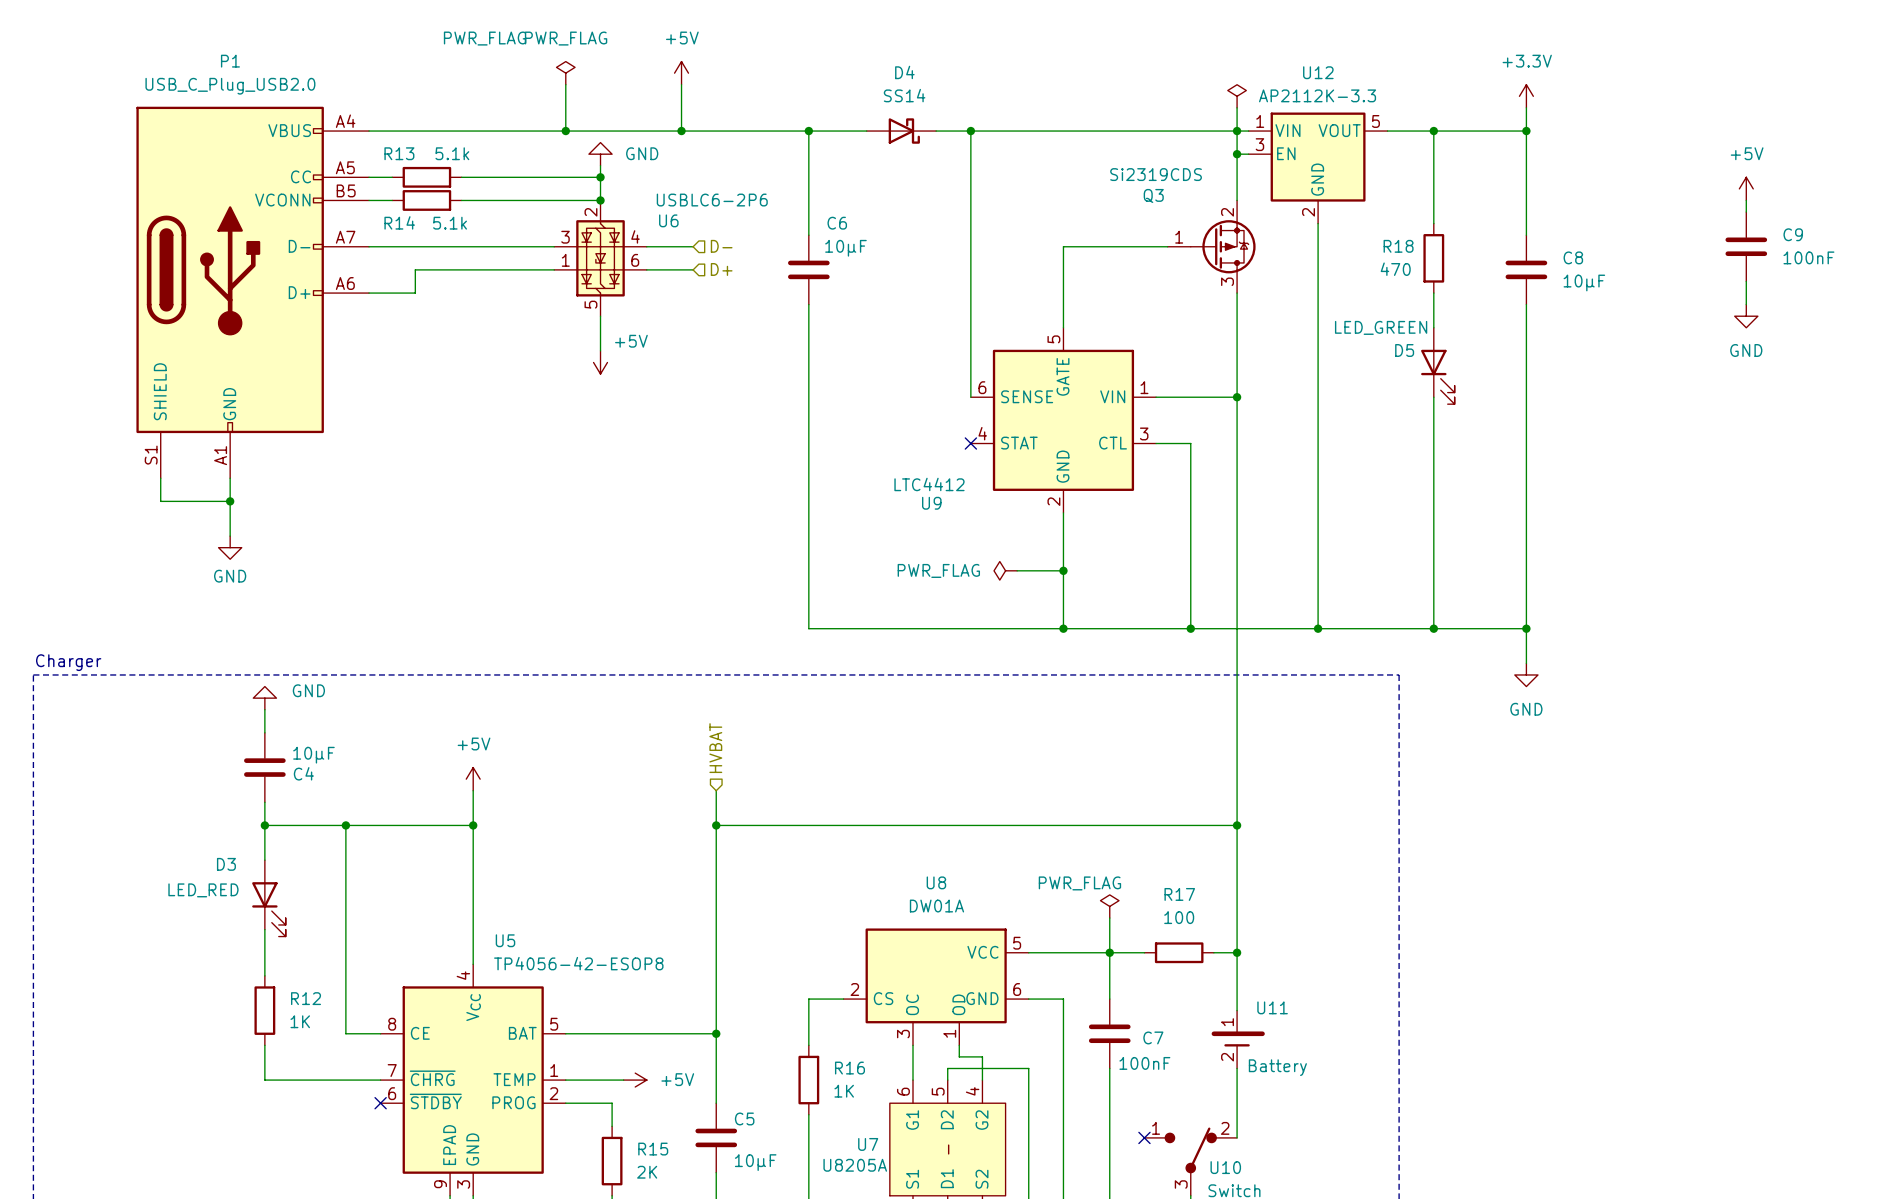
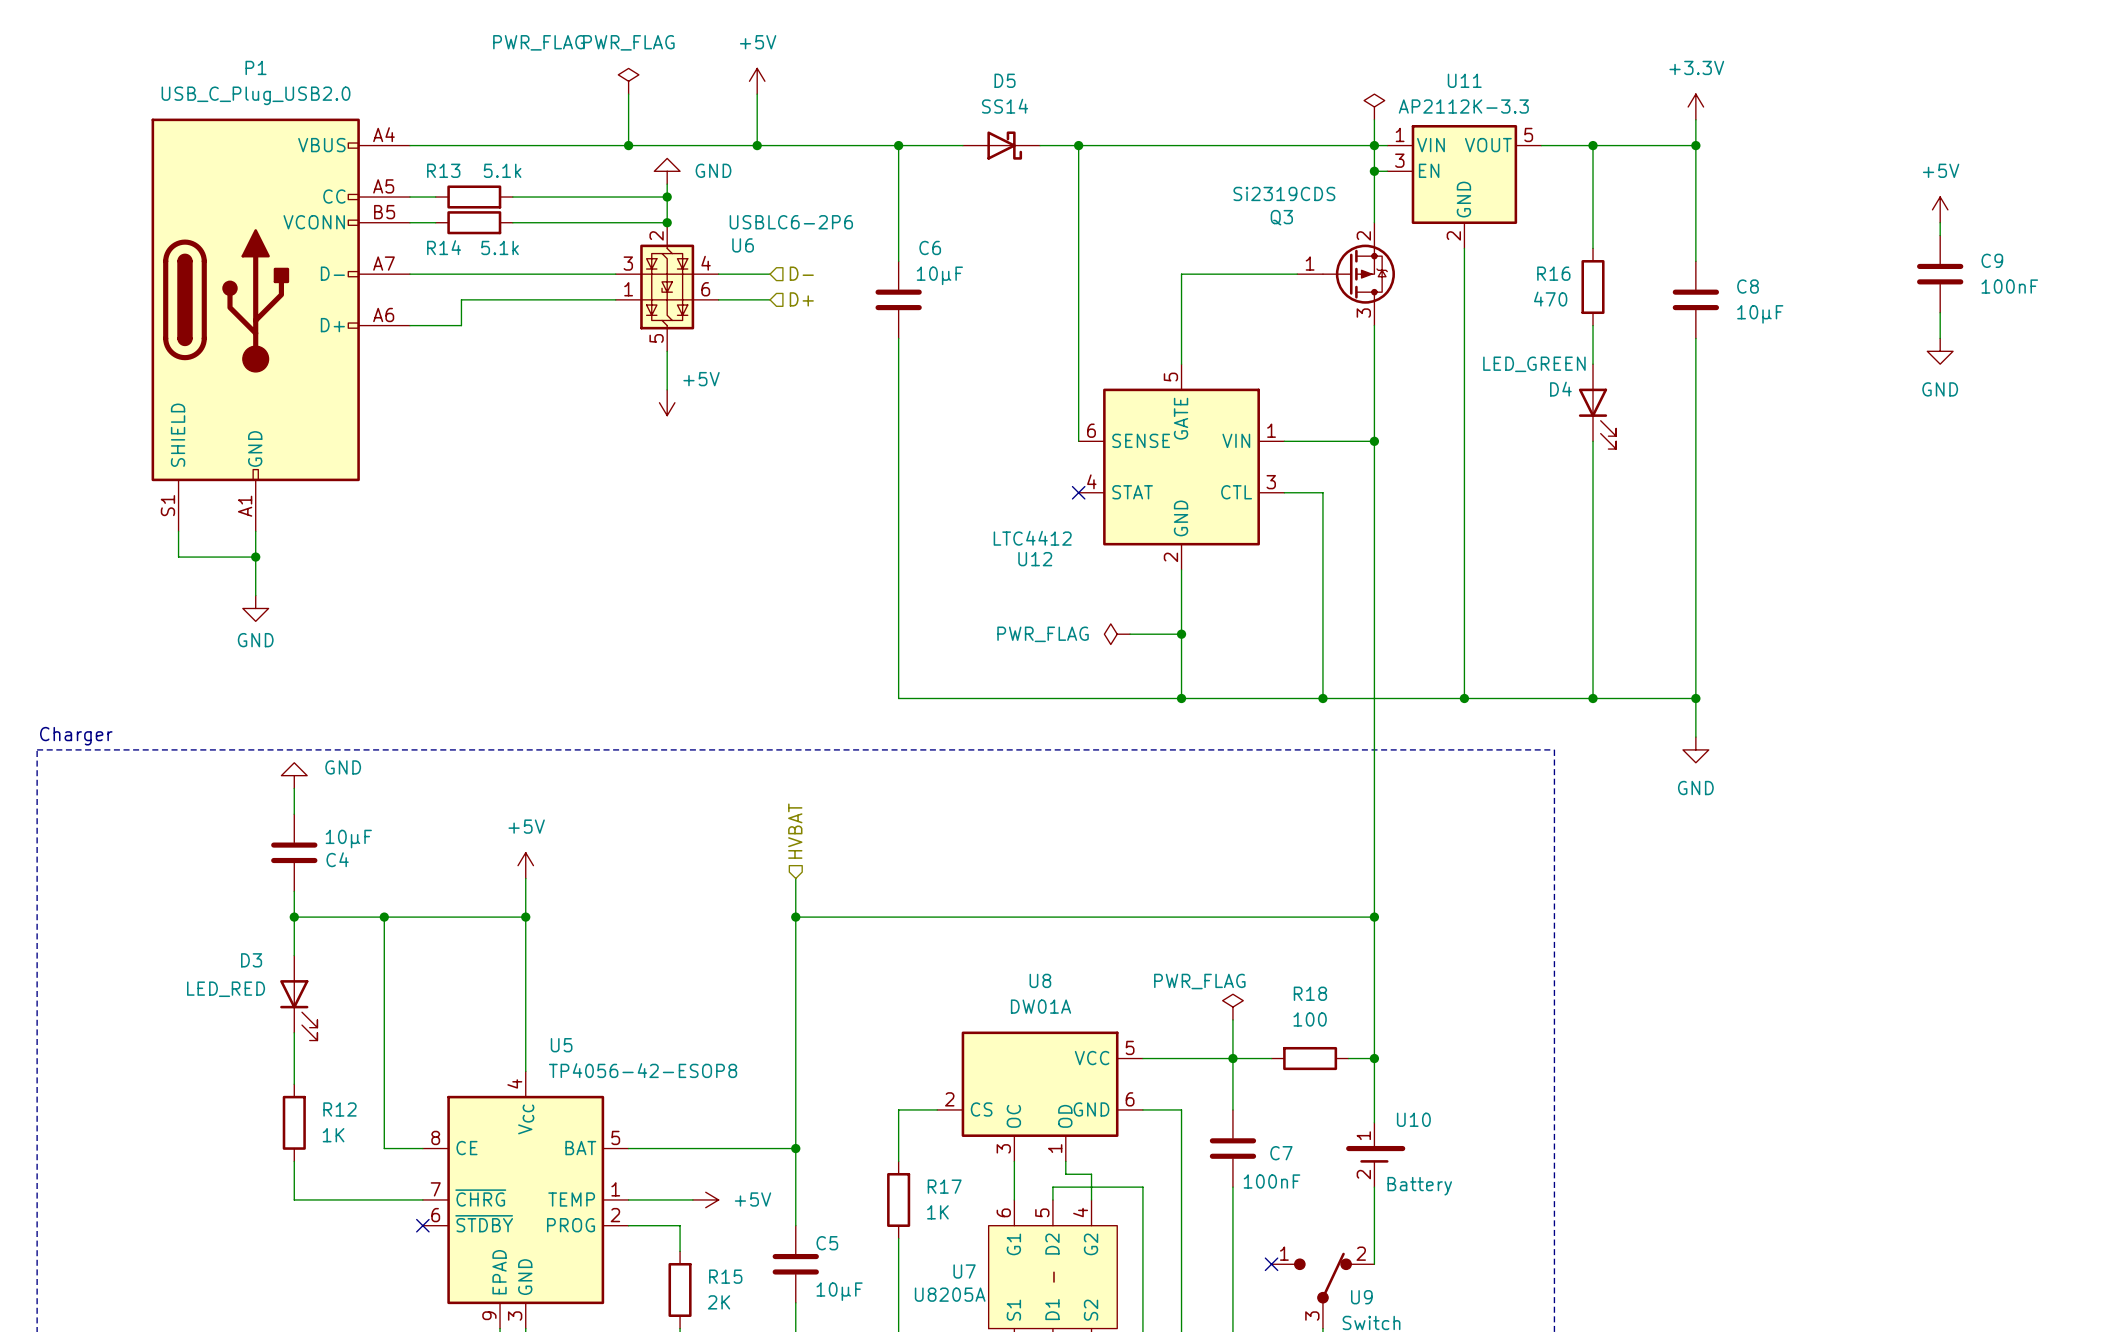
D4 name: D4 (904, 72) -> D5 (1005, 80)
U12 name: U12 (1318, 72) -> U11 (1464, 80)
R18 name: R18 (1398, 246) -> R16 (1553, 273)
D5 name: D5 (1404, 350) -> D4 (1560, 389)
U9 name: U9 (931, 503) -> U12 (1035, 559)
R17 name: R17 (1179, 894) -> R18 (1310, 993)
U11 name: U11 (1272, 1007) -> U10 (1413, 1119)
R16 name: R16 (849, 1068) -> R17 (944, 1186)
U10 name: U10 (1225, 1167) -> U9 (1361, 1297)

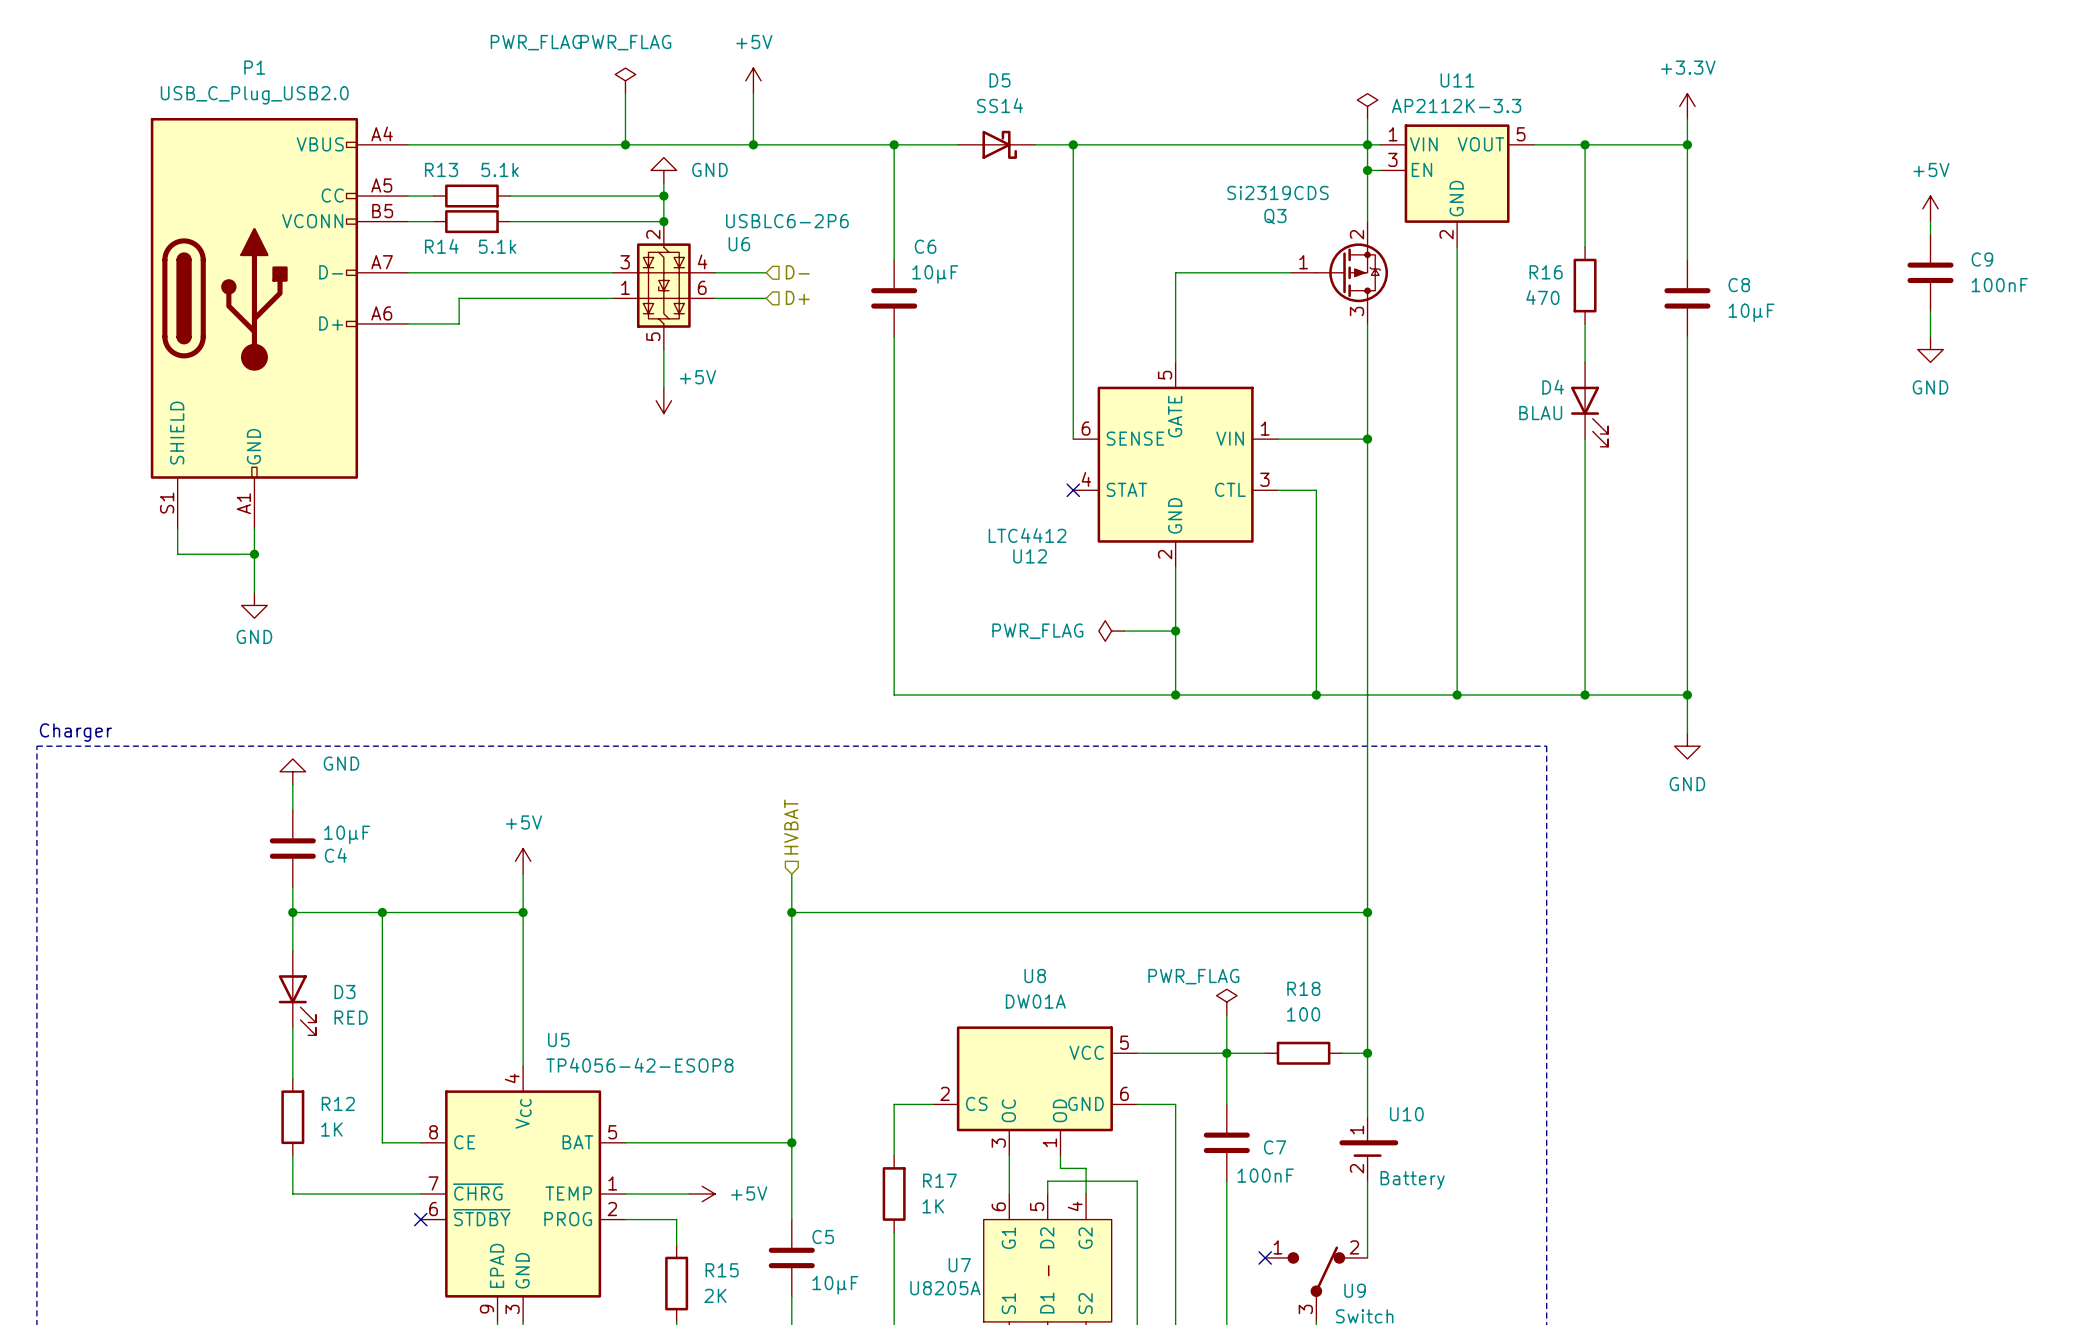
D4 value: LED_GREEN (1534, 364) -> BLAU (1540, 413)
D3 name position: D3 (251, 960) -> D3 (345, 992)
D3 value: LED_RED (226, 989) -> RED (351, 1017)

